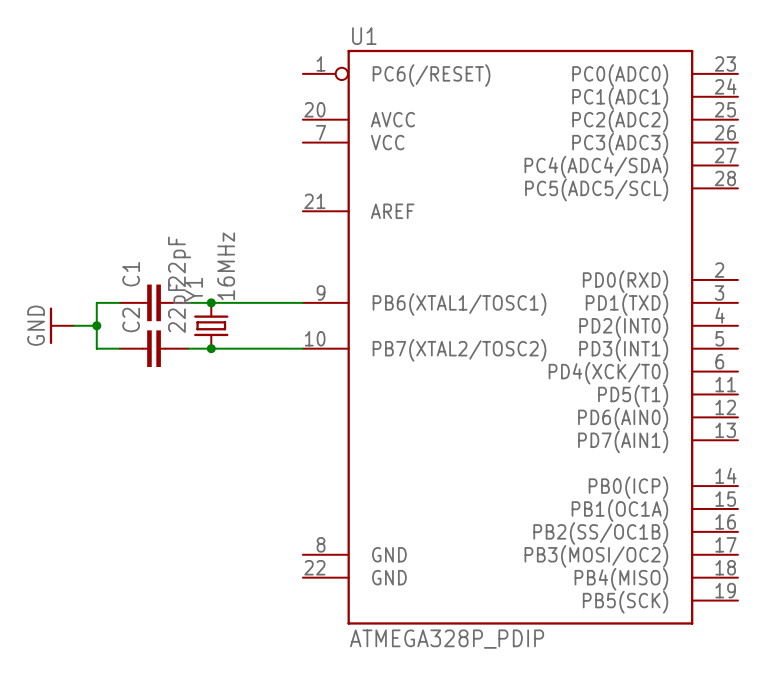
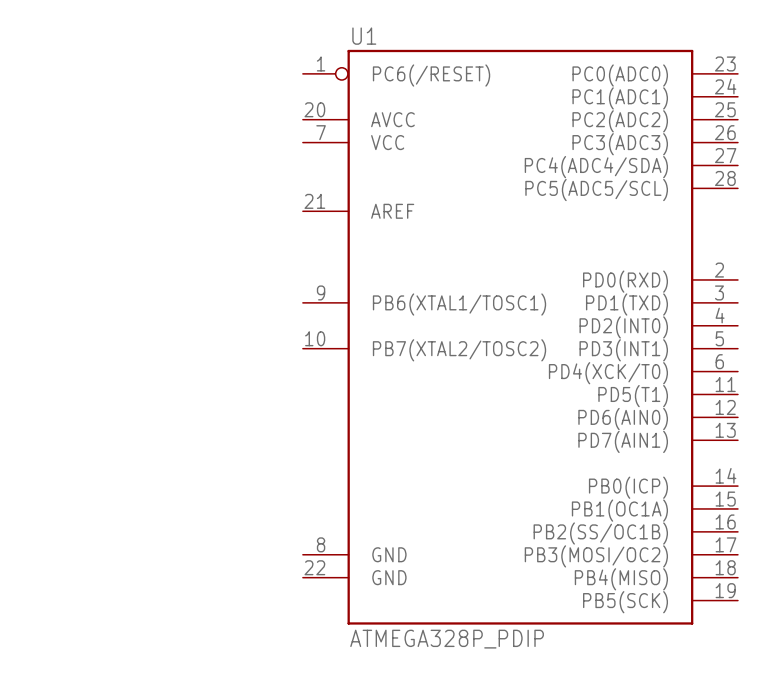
wire: (119, 302) (96, 302) (96, 348) (119, 348) -> none
C1: 22pF (154, 302) -> none
wire: (188, 302) (302, 302) -> none
junction: (211, 302) -> none
power symbol: GND (61, 325) -> none
wire: (73, 325) (96, 325) -> none
junction: (96, 325) -> none
Y1: 16MHz (211, 325) -> none
C2: 22pF (154, 348) -> none
wire: (188, 348) (302, 348) -> none
junction: (211, 348) -> none

